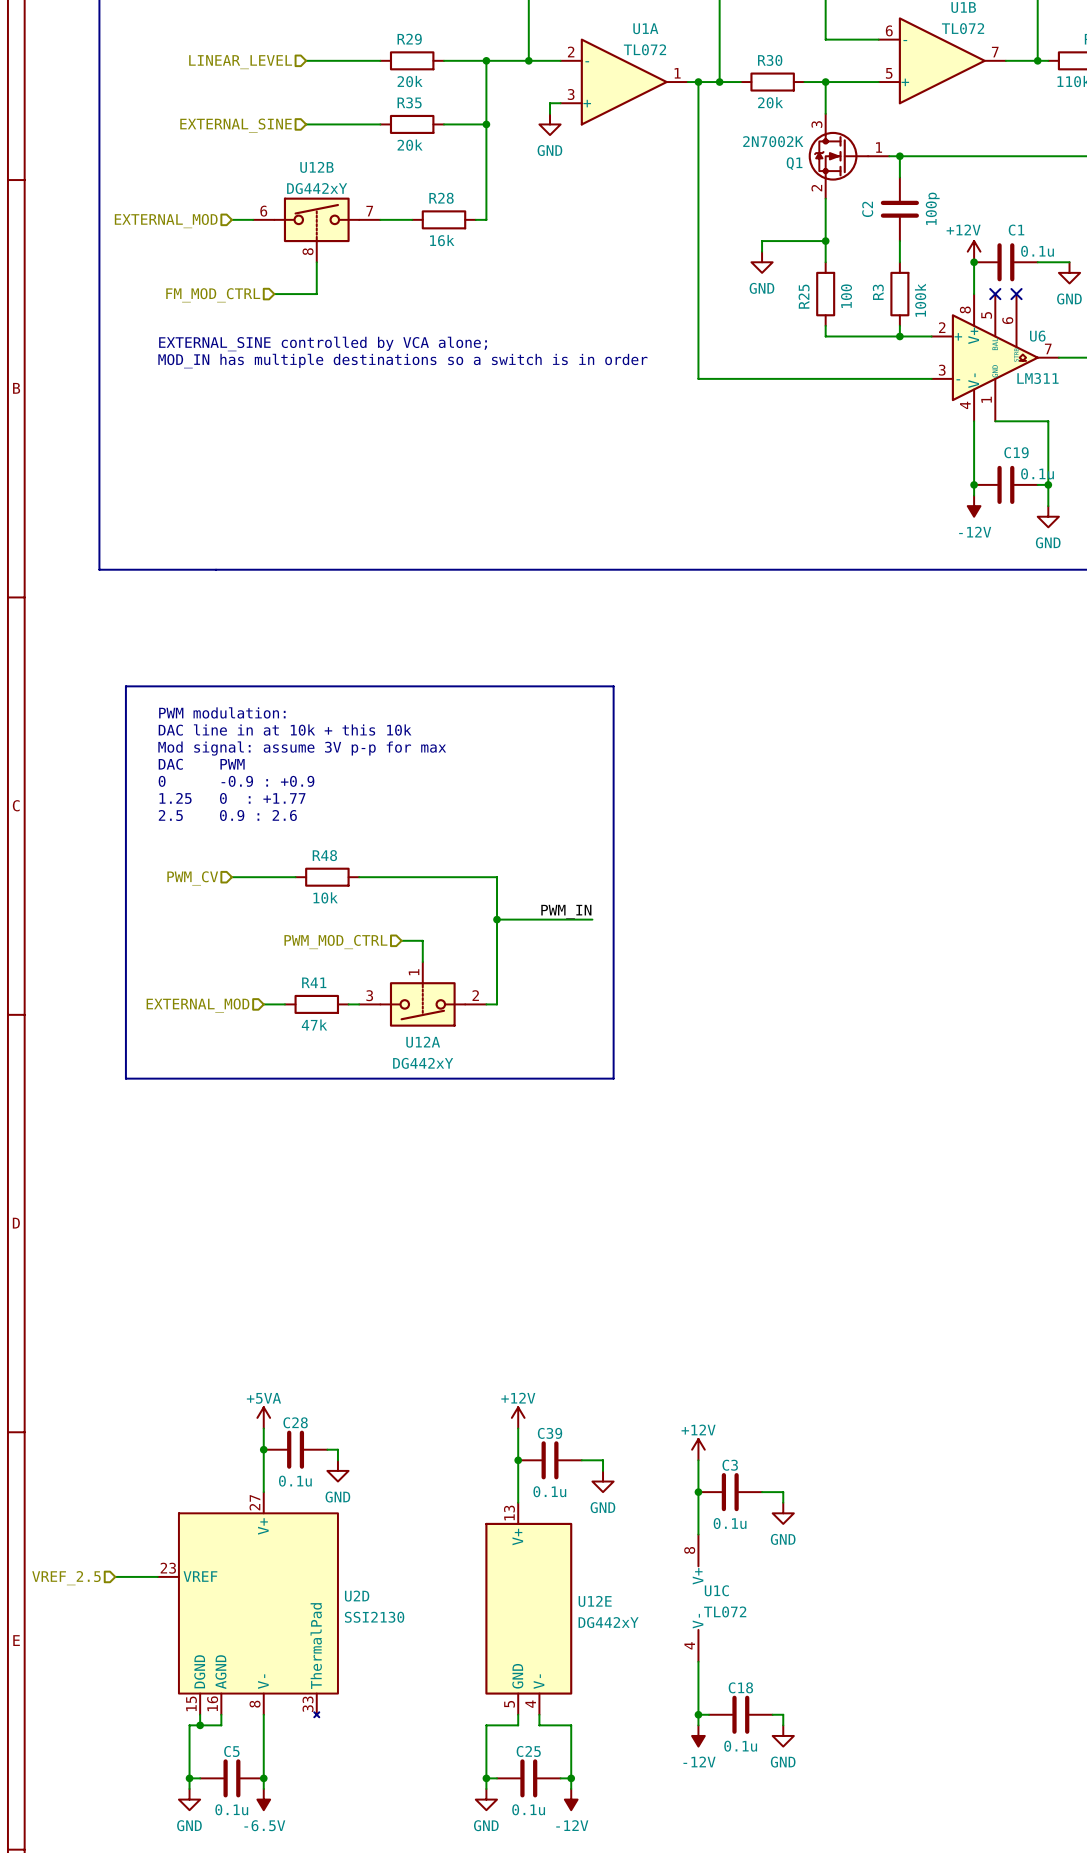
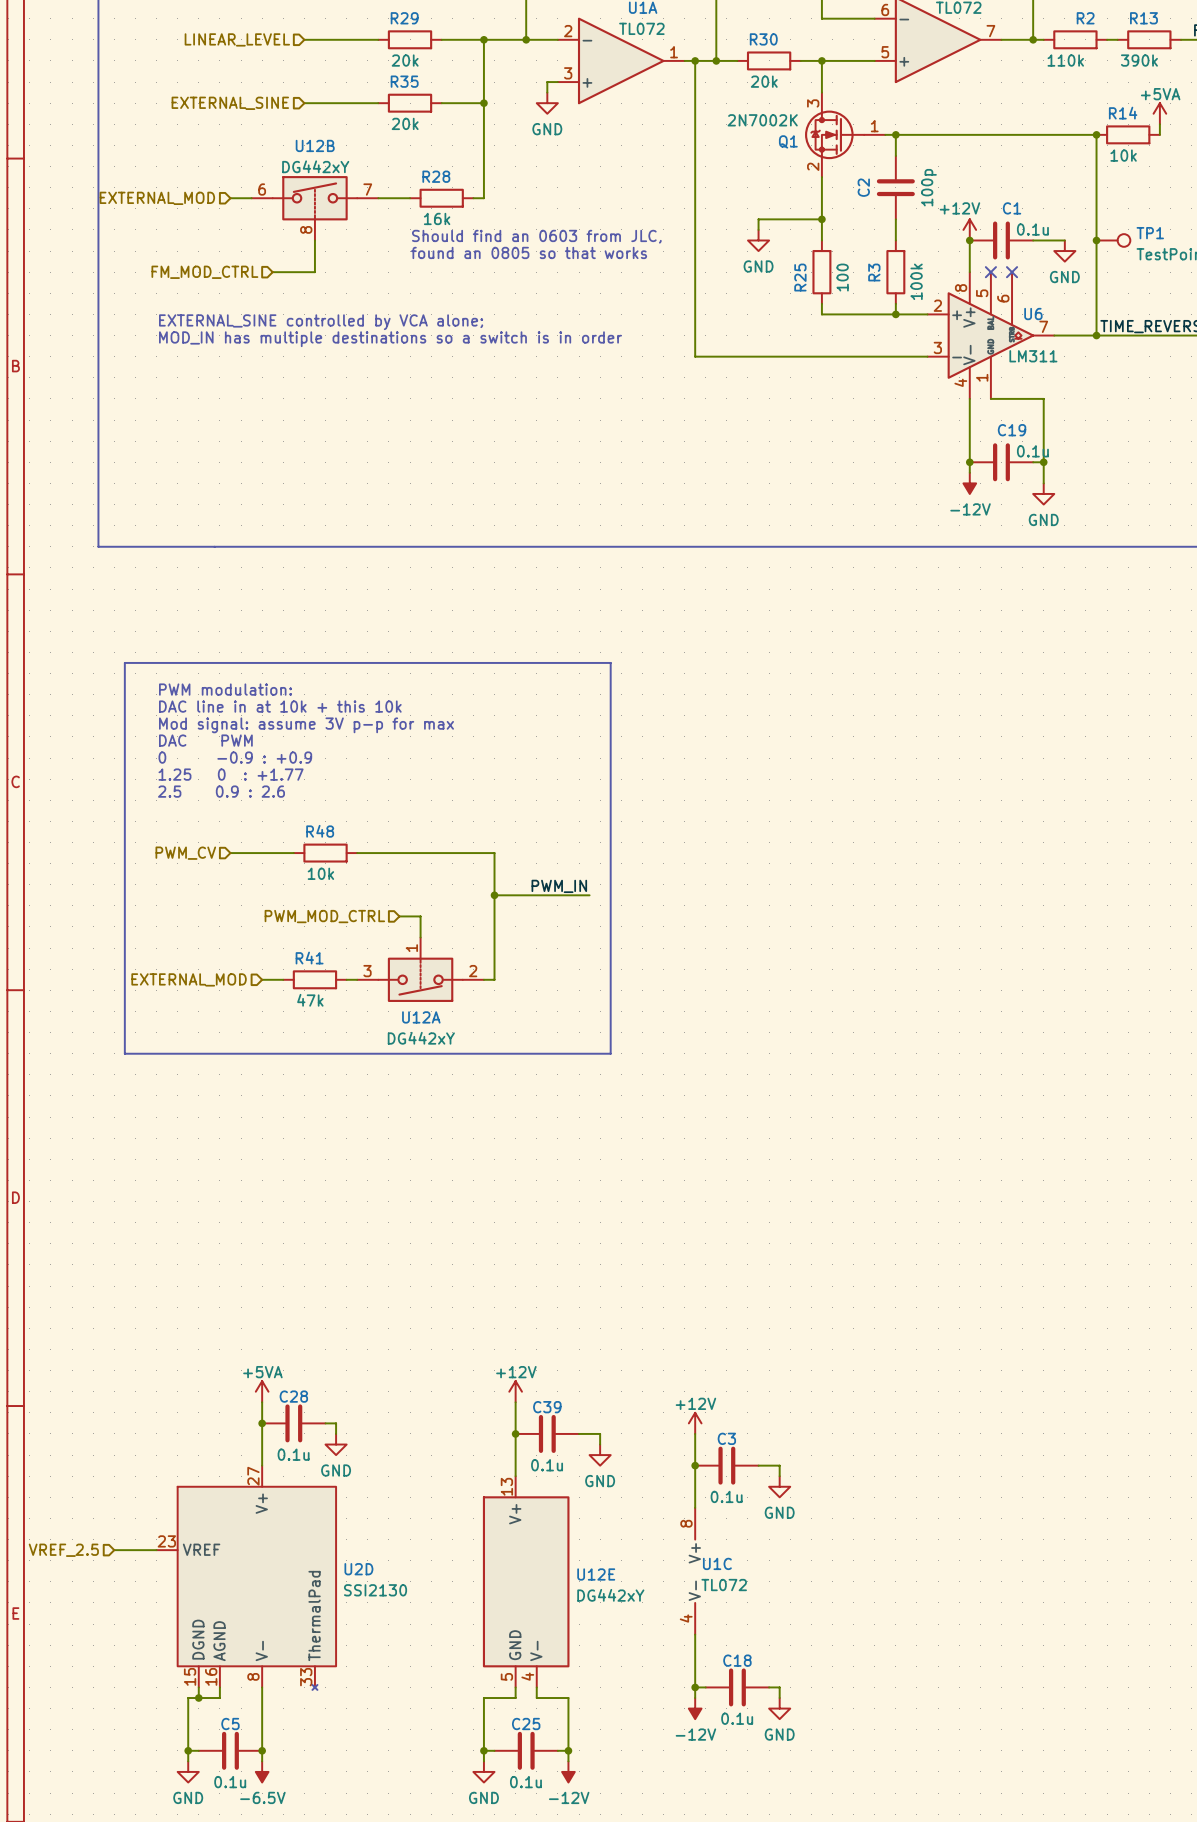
text: none -> Should find an 0603 from JLC, (536, 236)
text: none -> found an 0805 so that works (529, 252)

